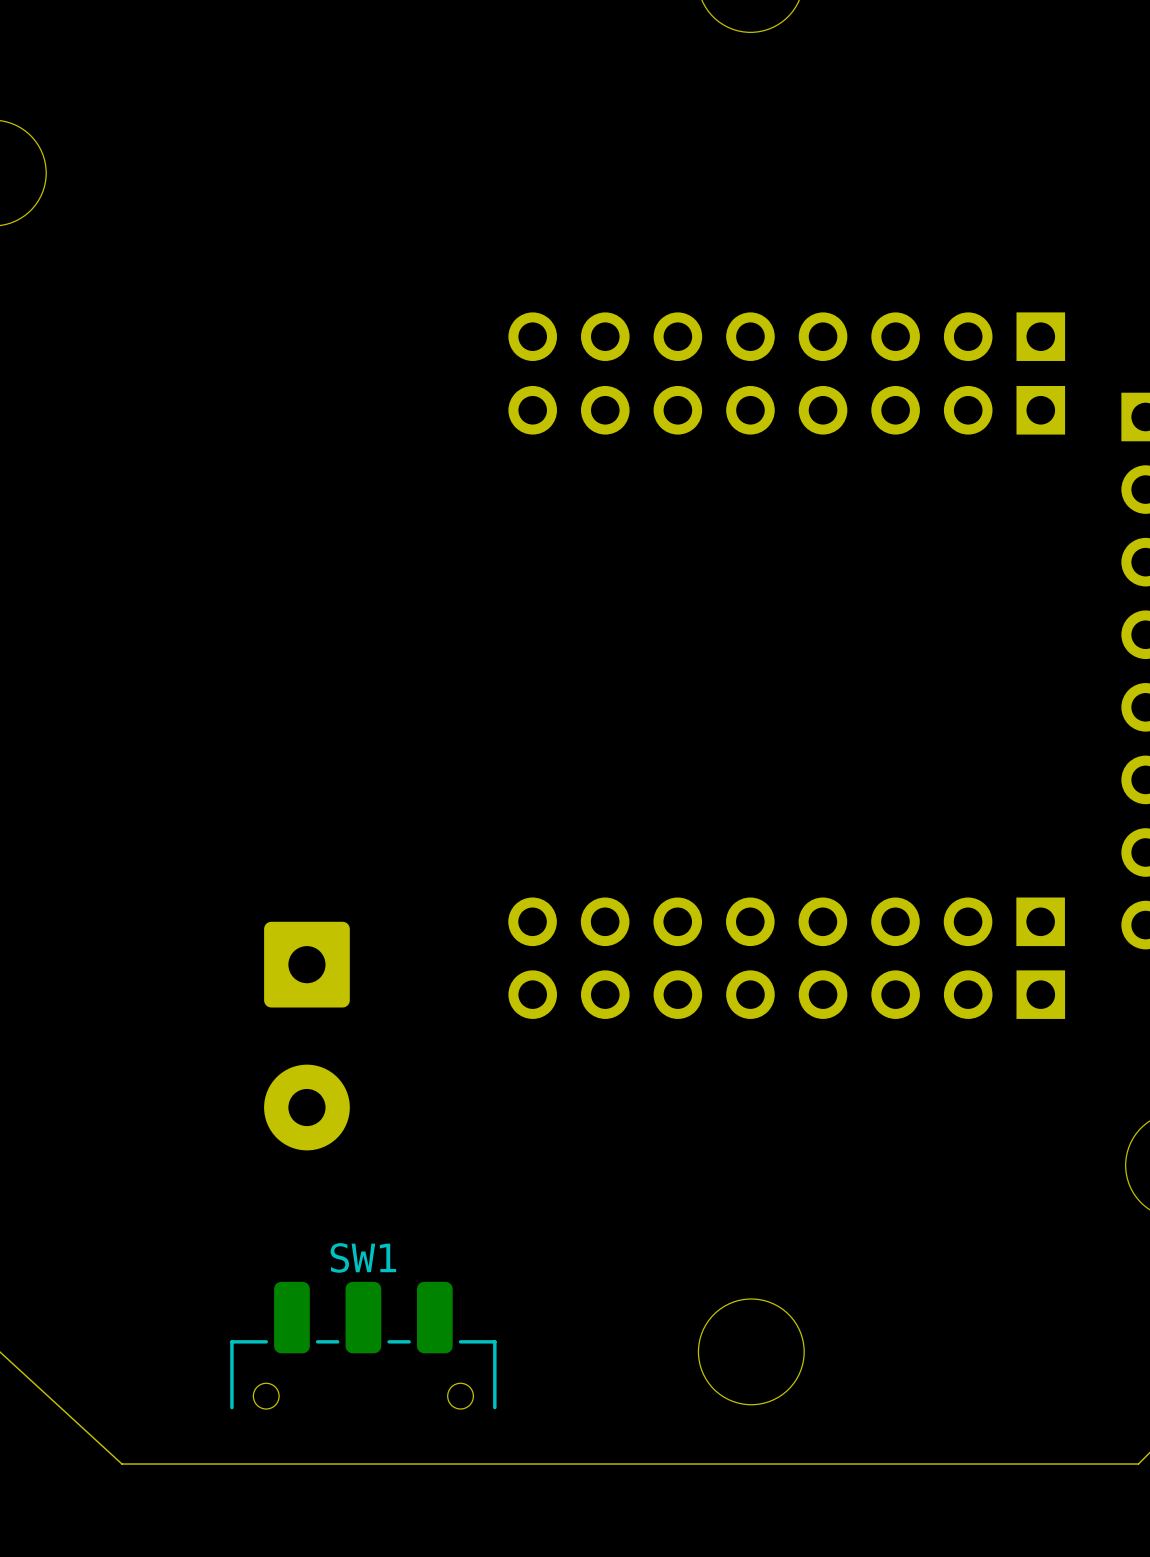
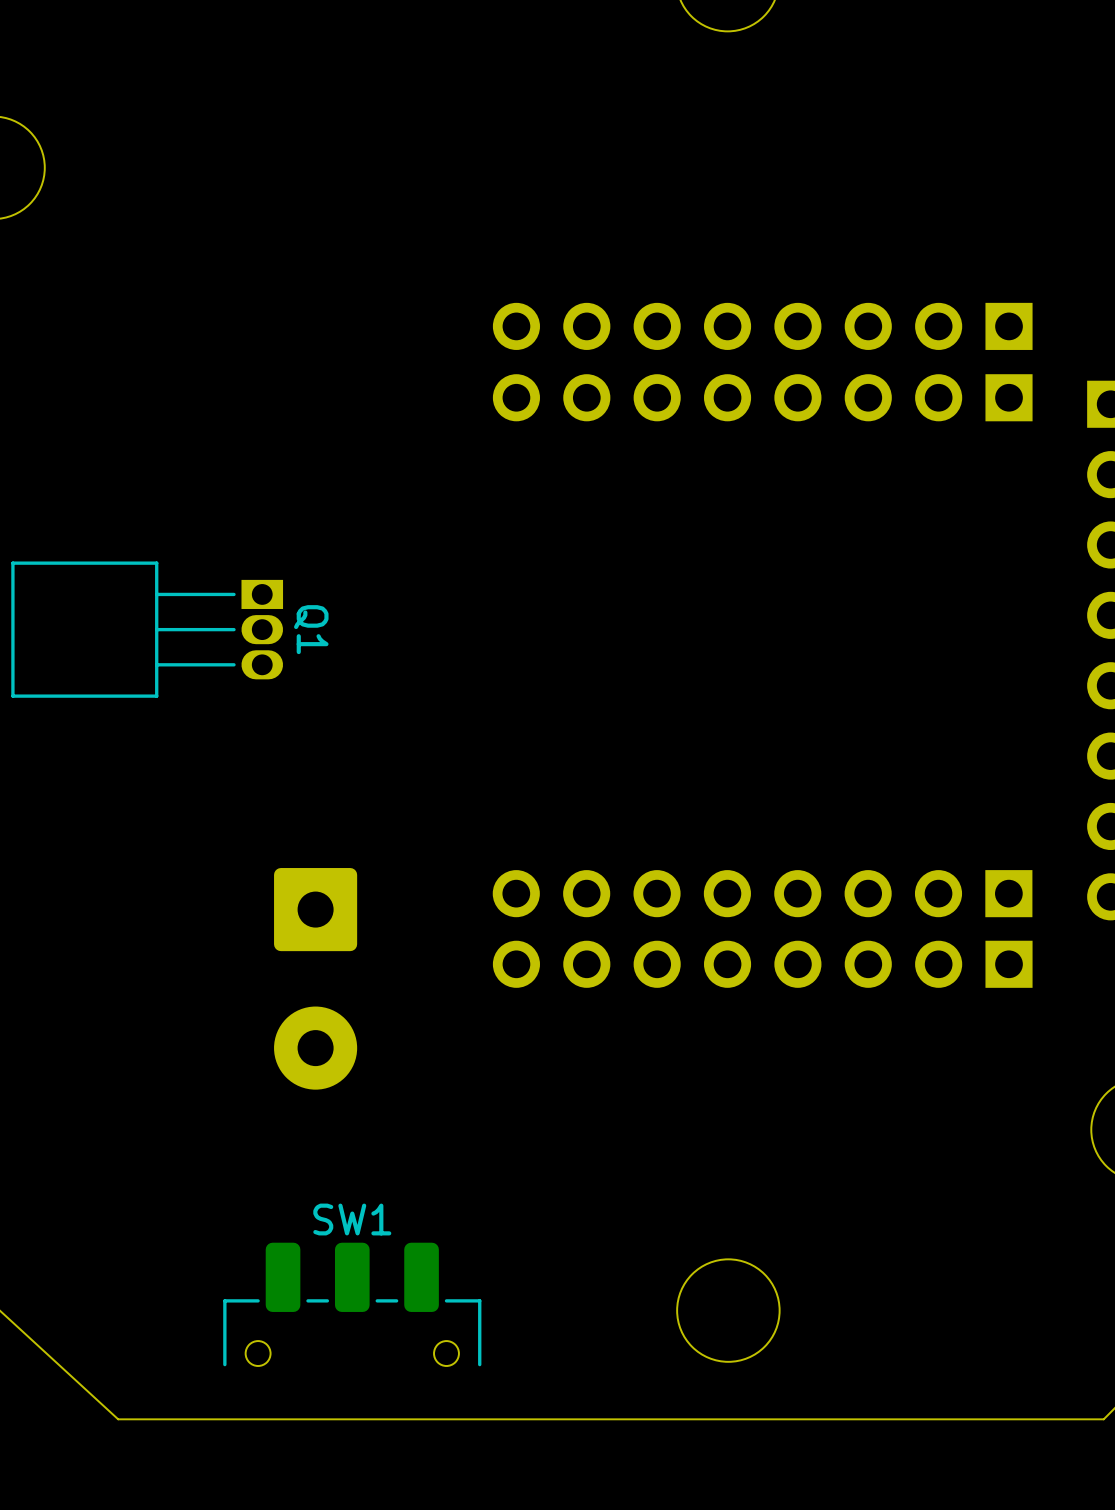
Q1: none -> (147, 629)
part position: (306, 1036) -> (315, 978)

